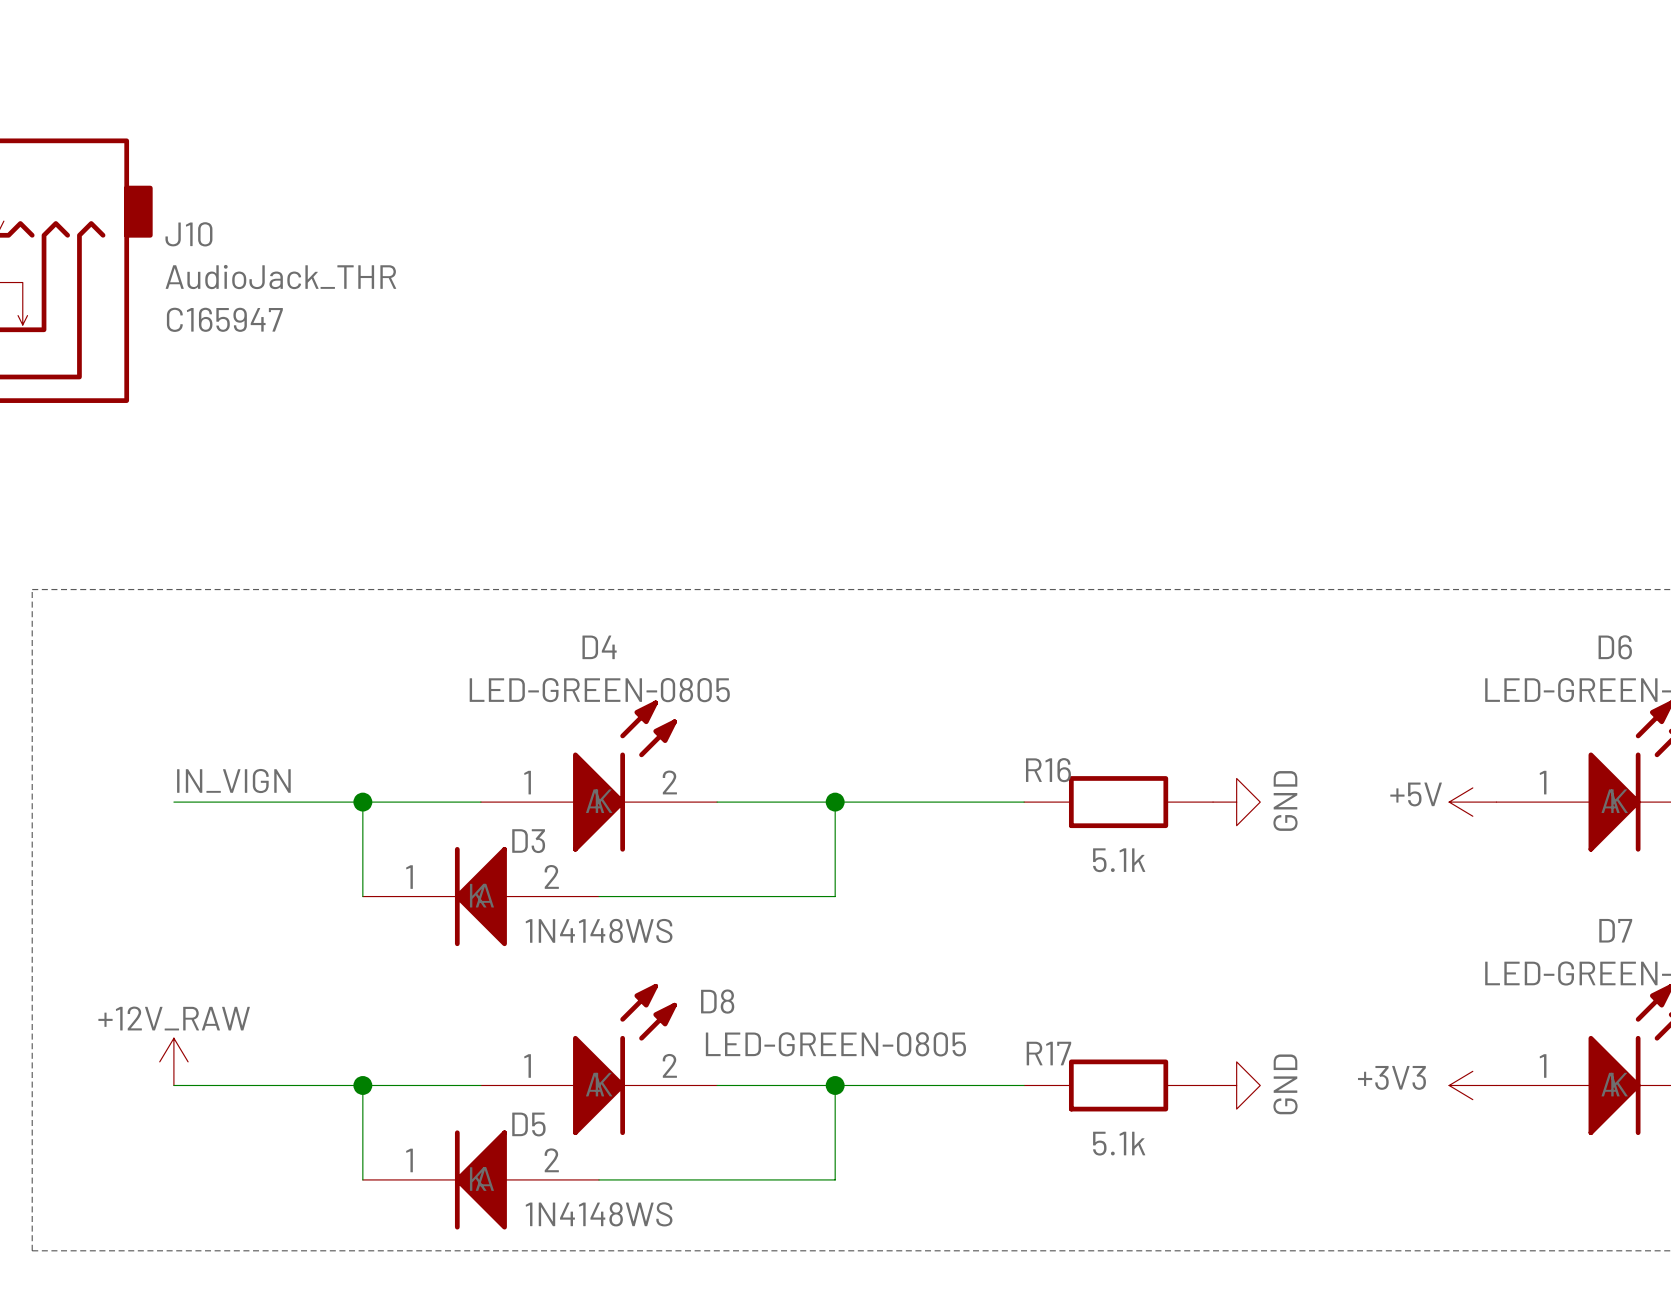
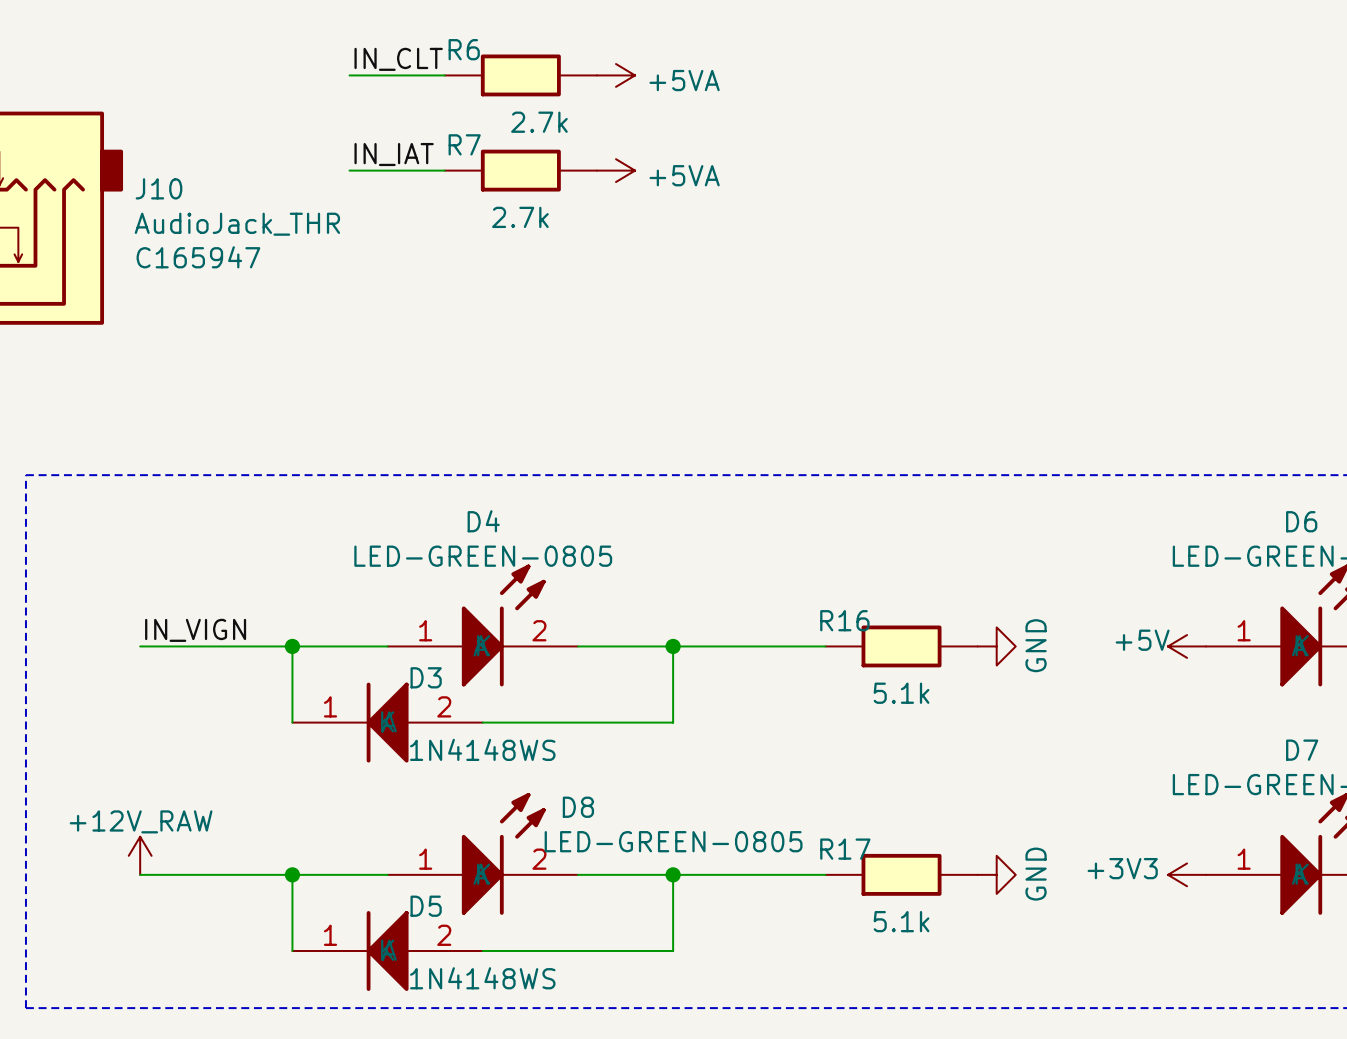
label: none -> IN_CLT (398, 59)
wire: none -> (349, 75) (444, 75)
R6: none -> 2.7k (520, 75)
power symbol: none -> +5VA (616, 75)
label: none -> IN_IAT (394, 154)
wire: none -> (349, 170) (444, 170)
R7: none -> 2.7k (520, 170)
power symbol: none -> +5VA (616, 170)

